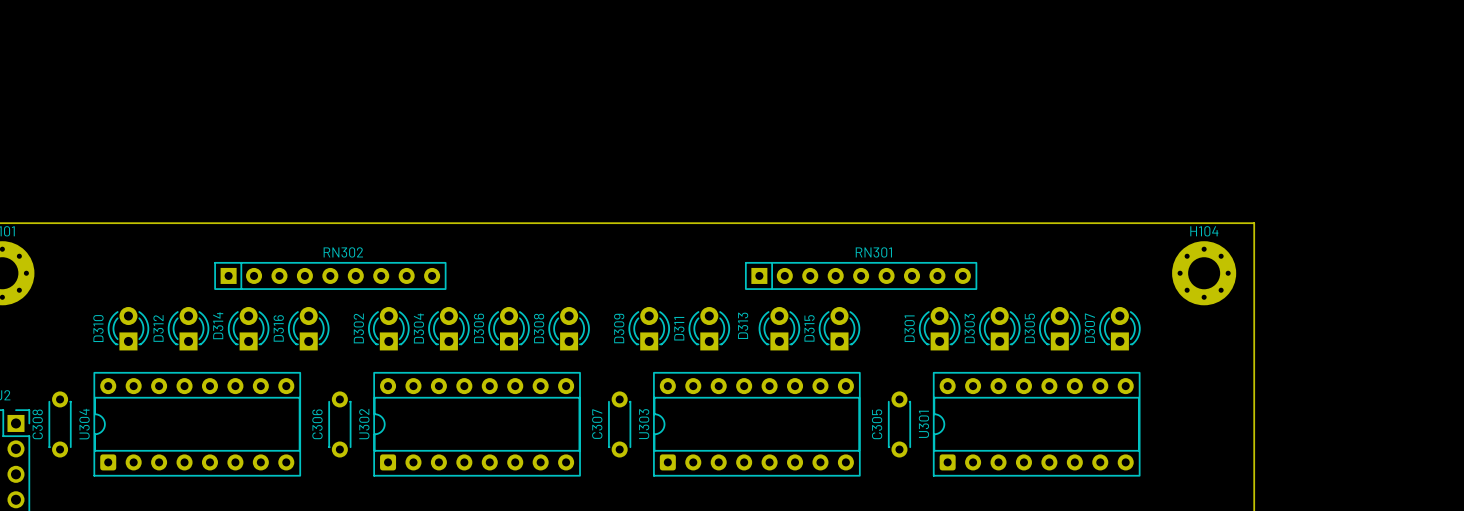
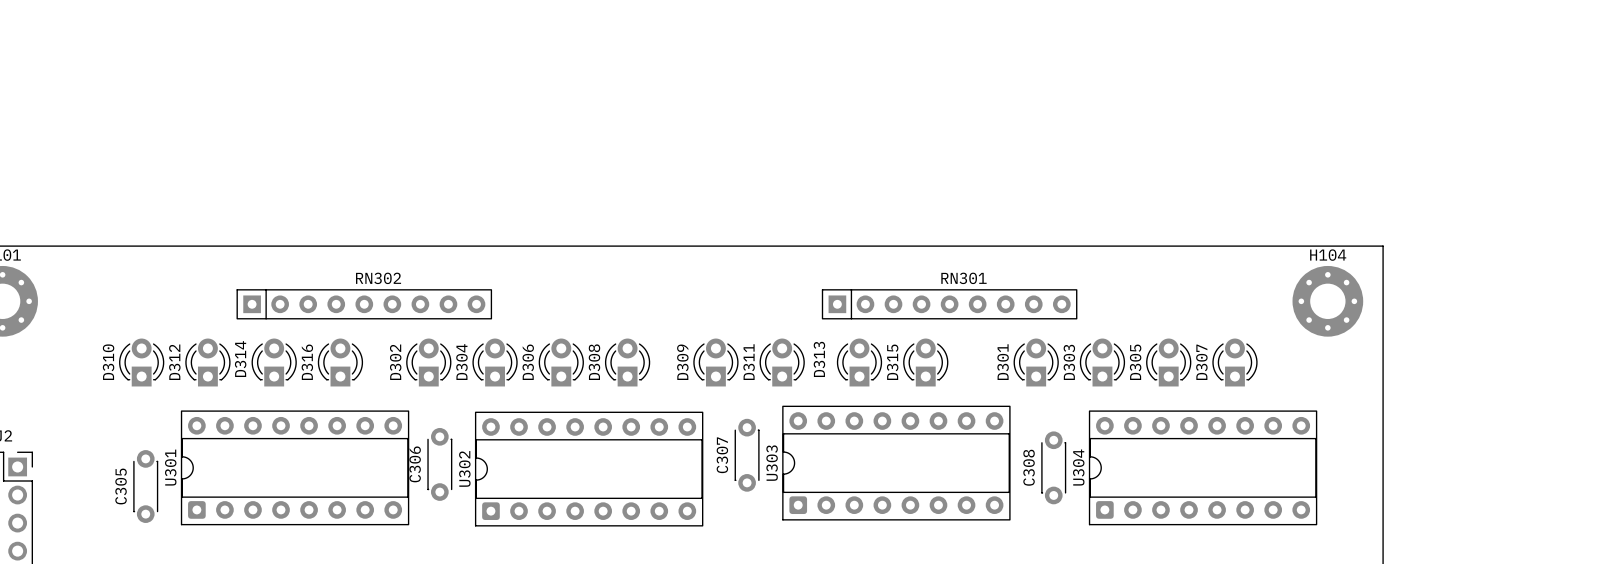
C308 position: (60, 424) -> (1053, 467)
U304 position: (197, 424) -> (1203, 467)
C306 position: (339, 424) -> (439, 464)
U302 position: (477, 424) -> (589, 469)
C307 position: (619, 424) -> (747, 455)
U303 position: (756, 424) -> (896, 463)
C305 position: (899, 424) -> (145, 486)
U301 position: (1036, 424) -> (295, 467)

